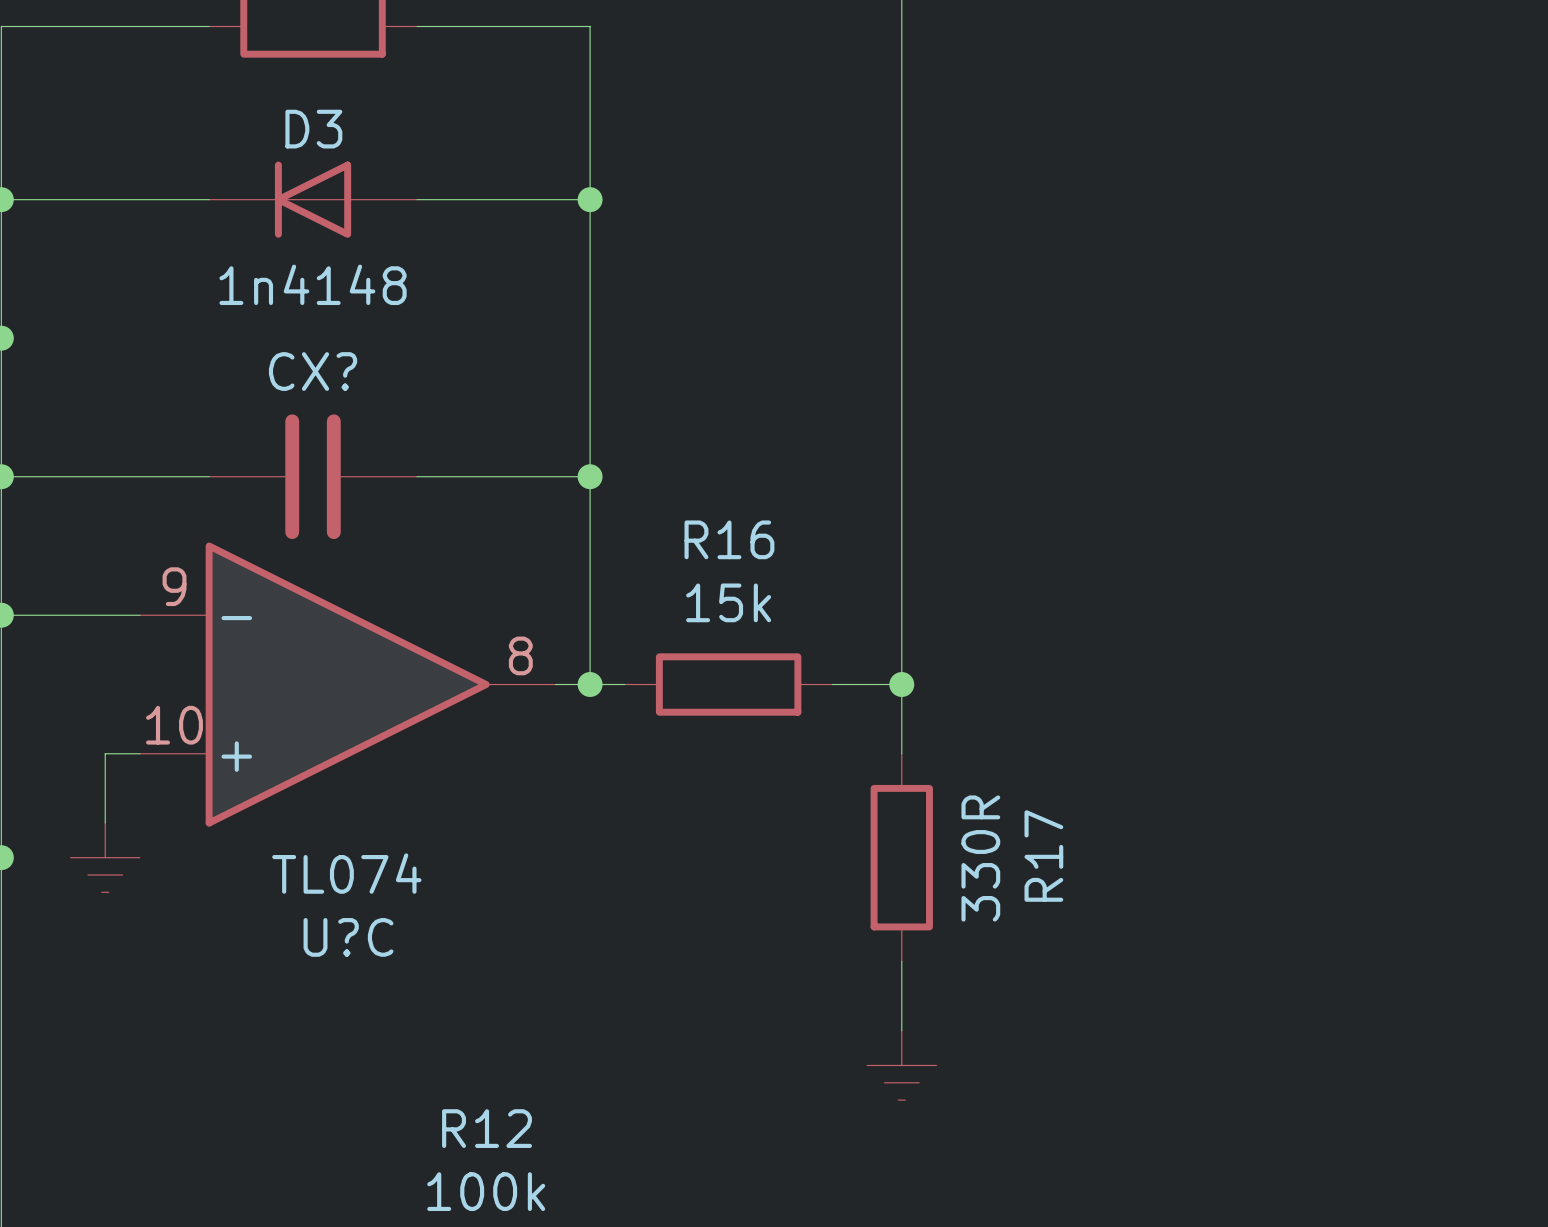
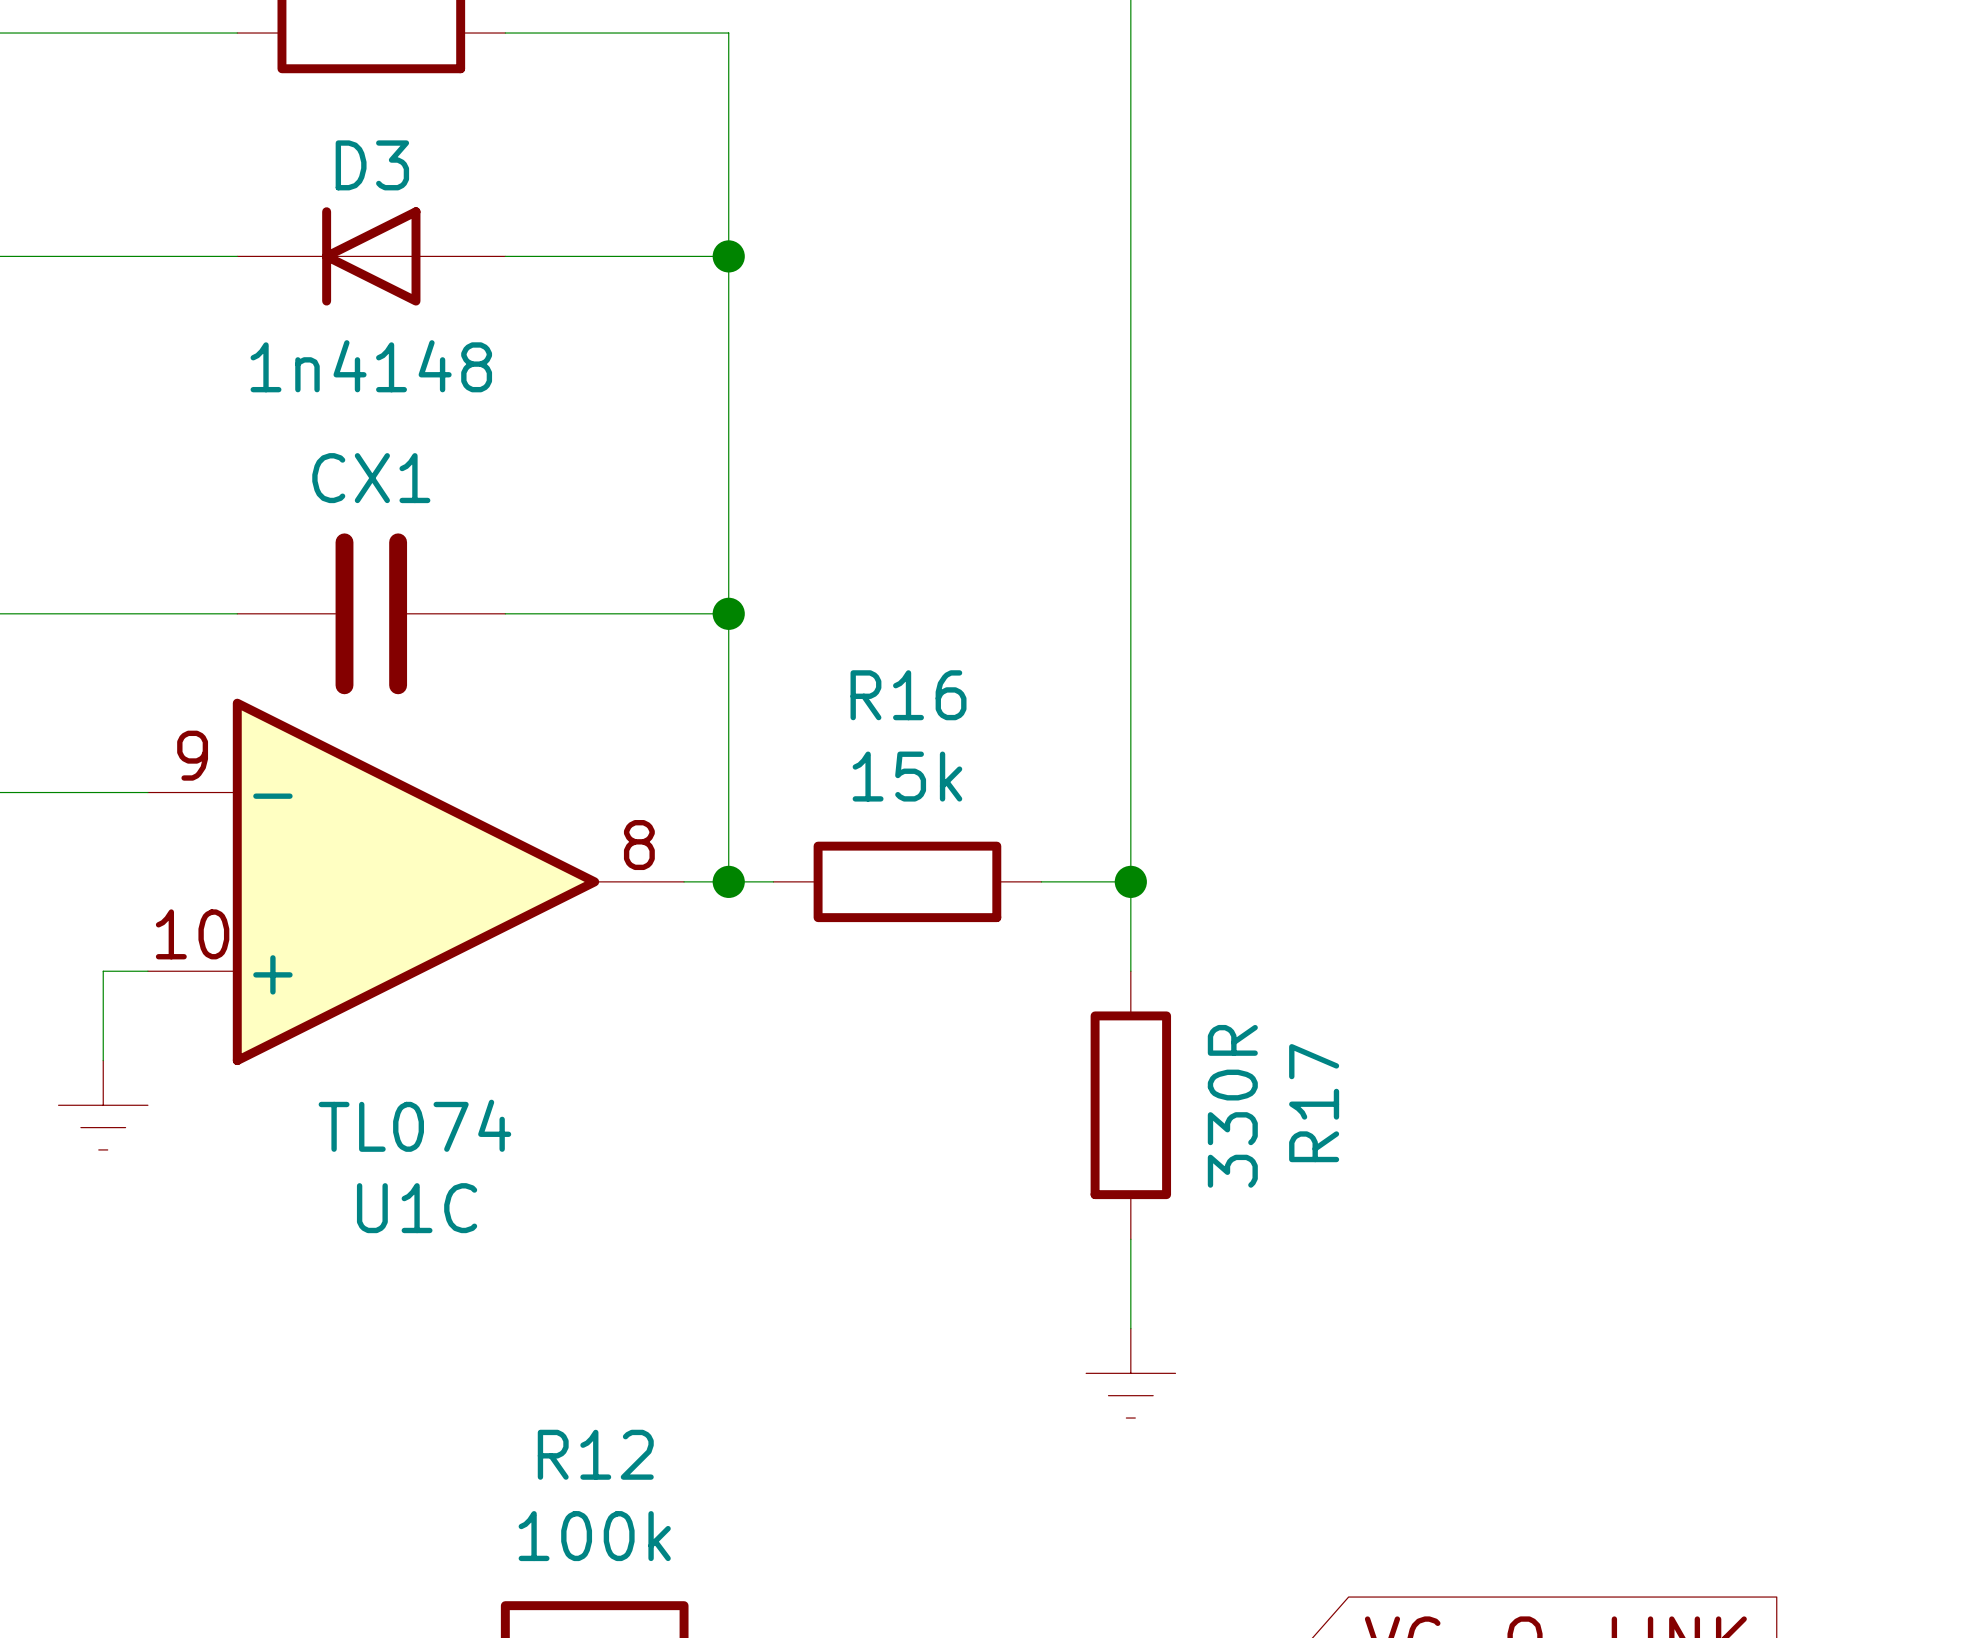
CX? name: CX? (313, 371) -> CX1 (371, 478)
U?C name: U?C (348, 937) -> U1C (417, 1208)

